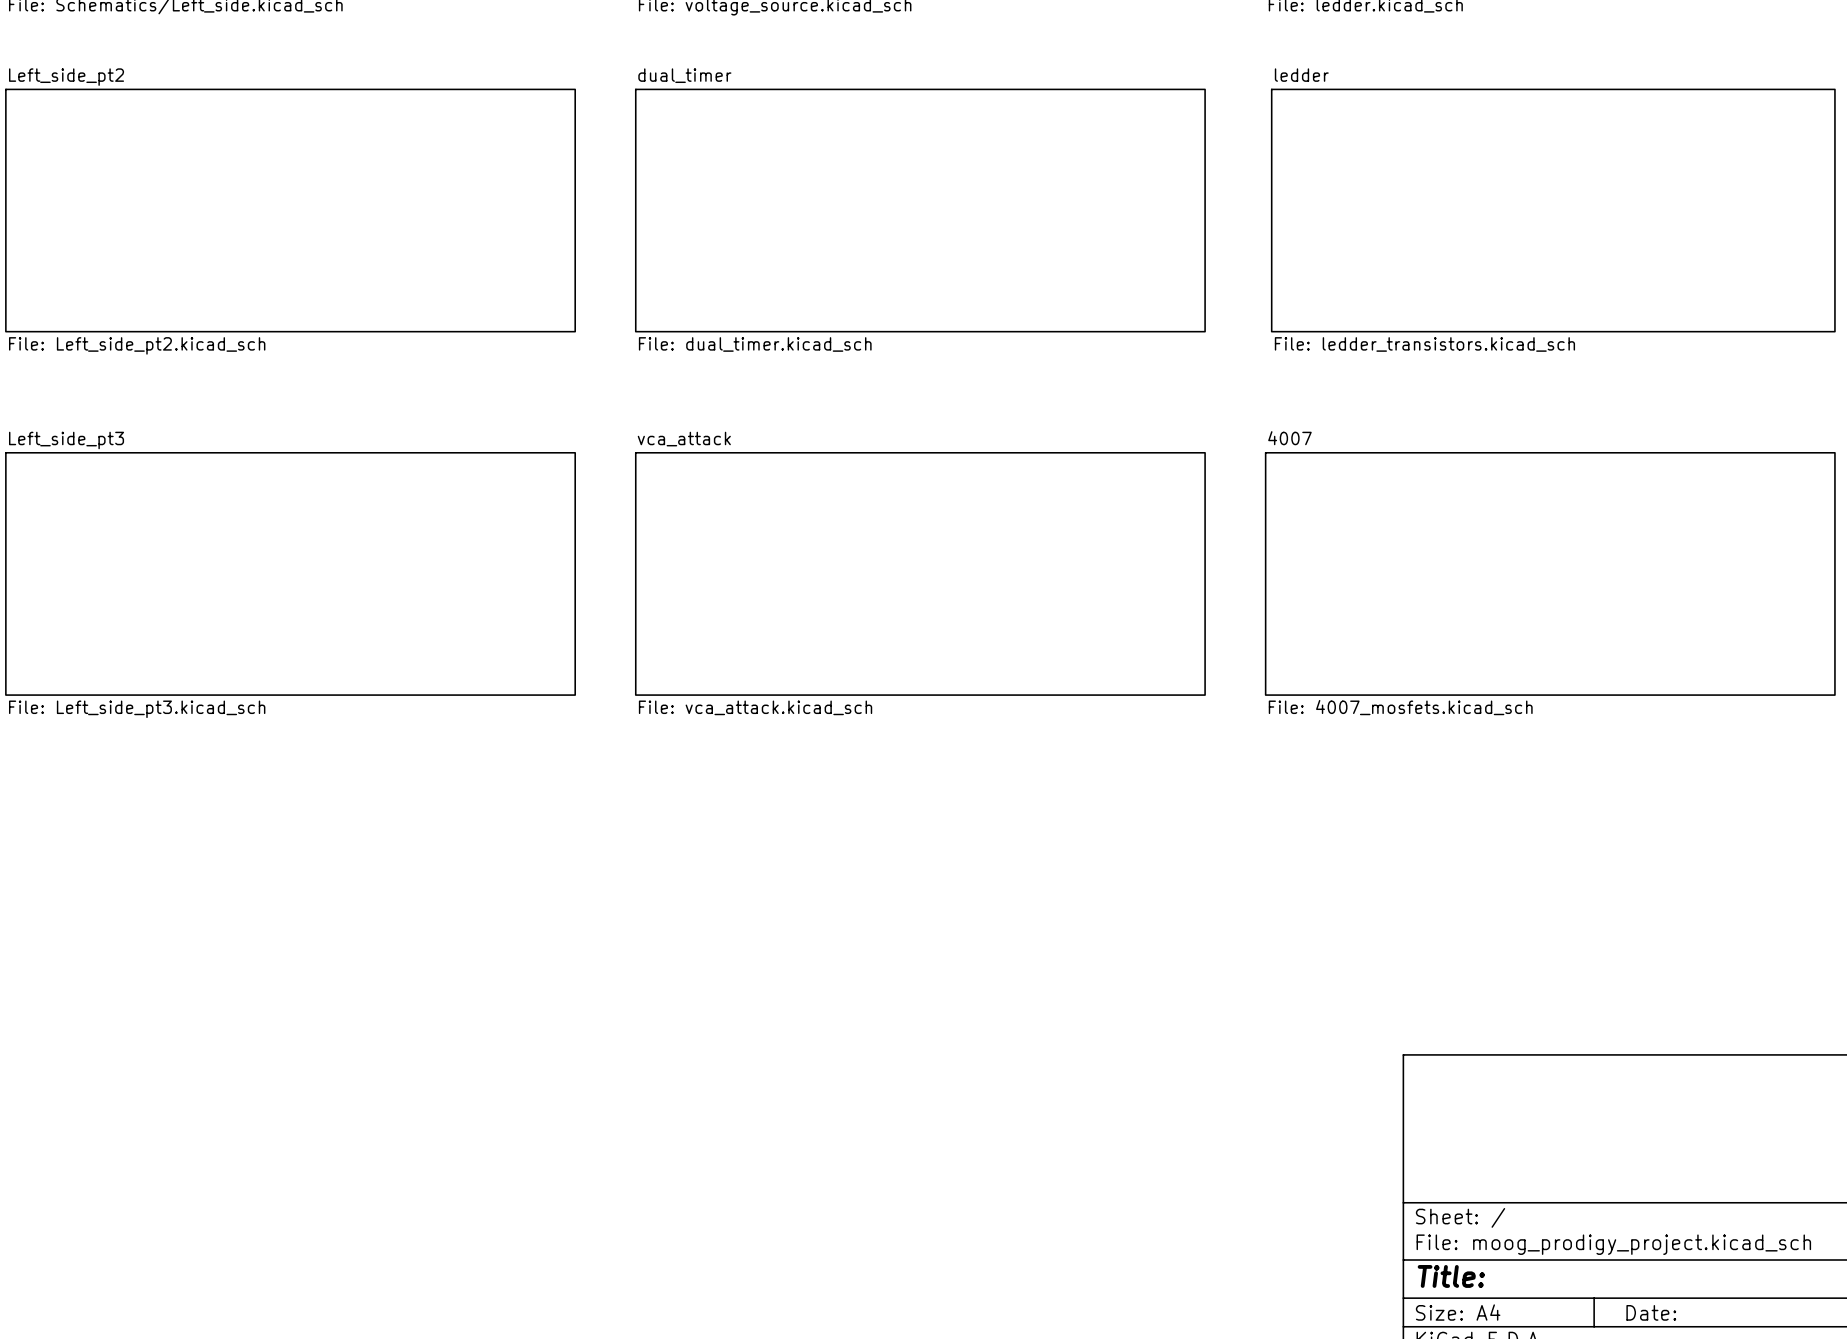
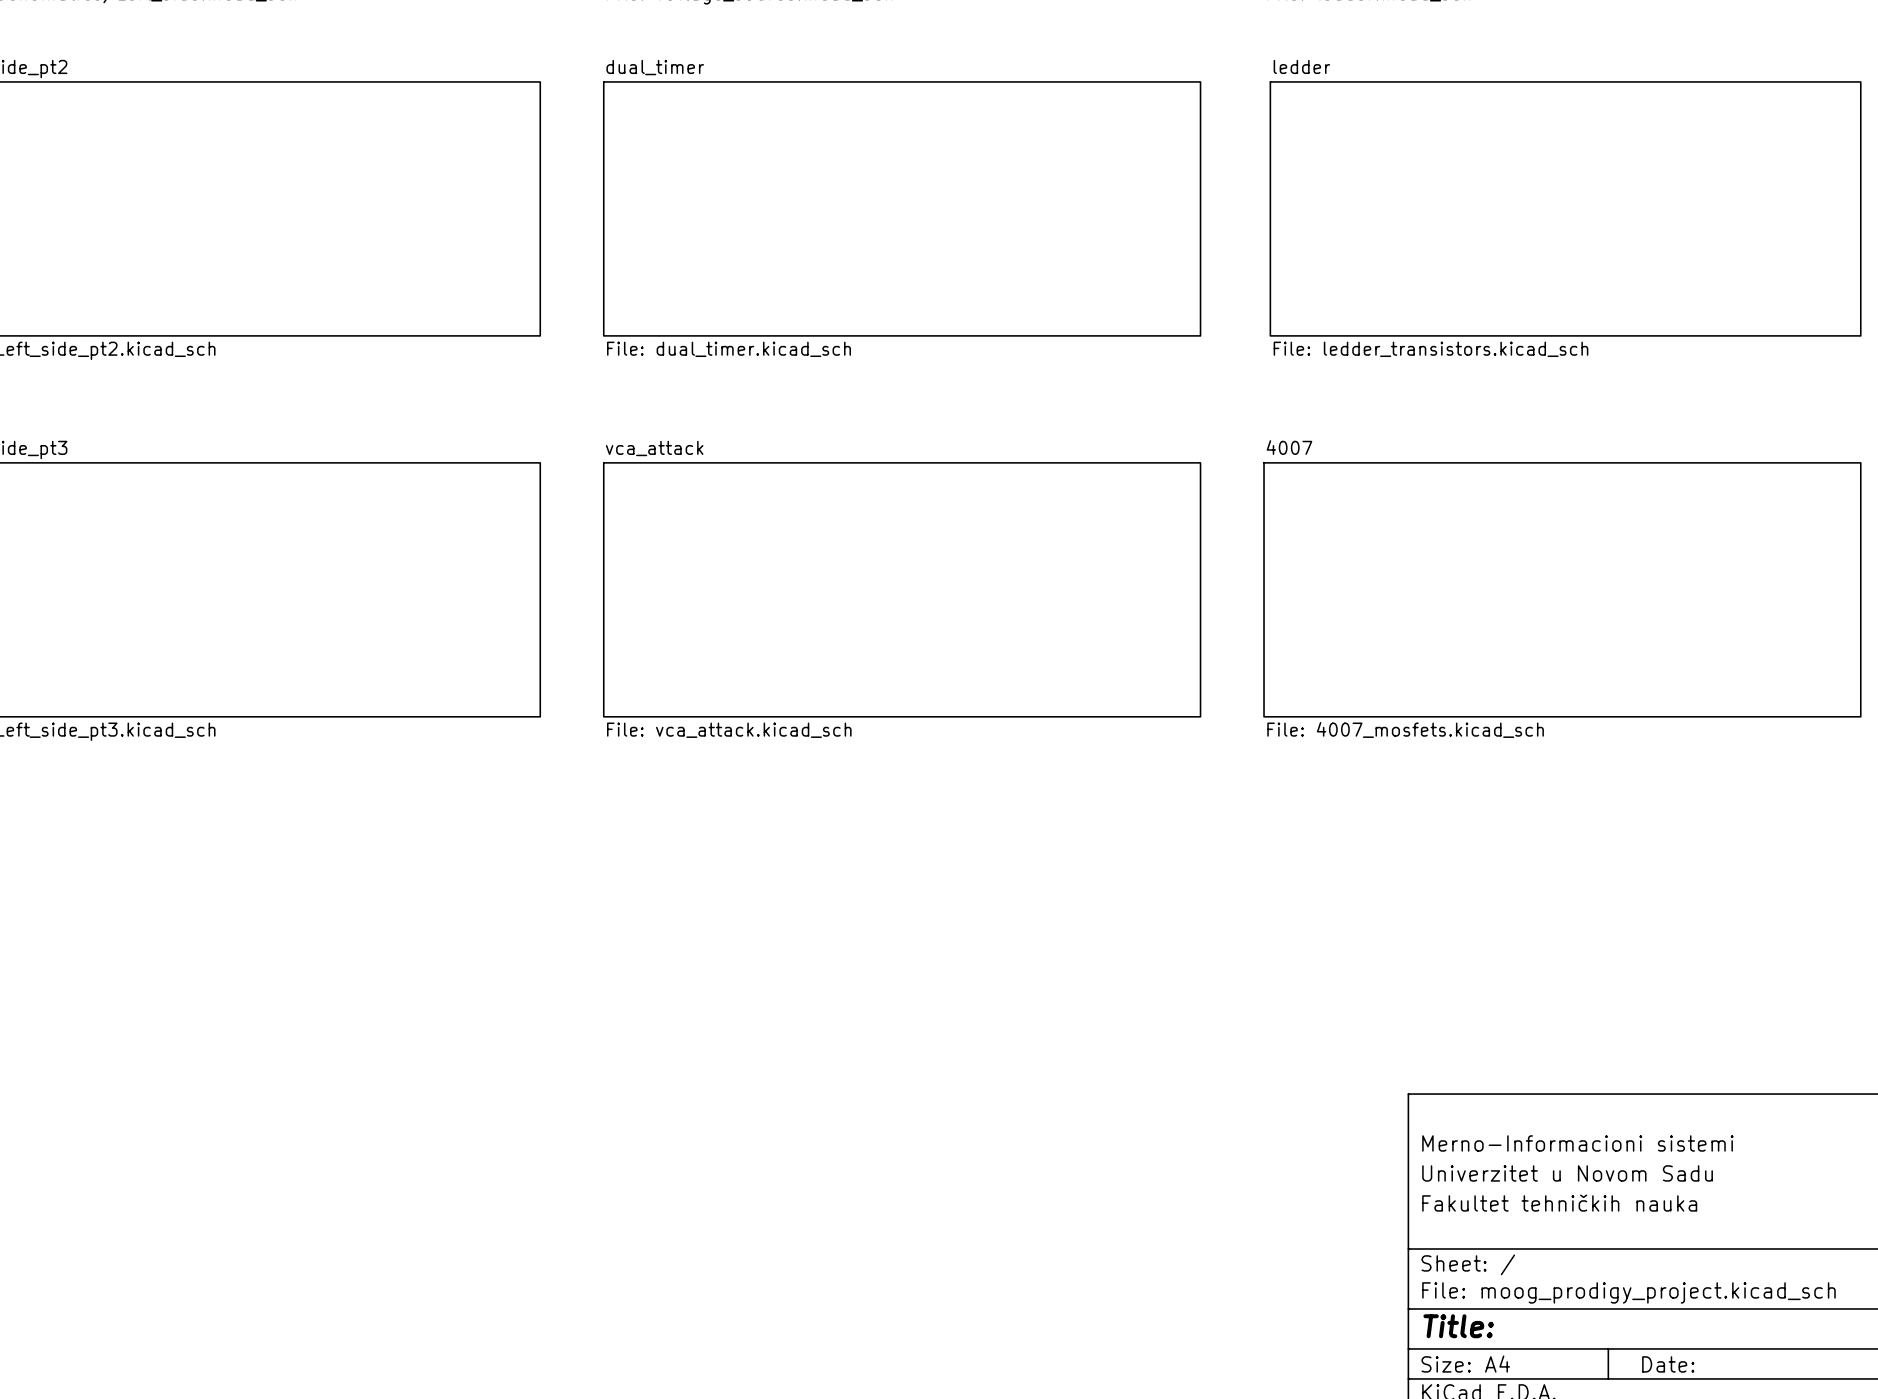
title block: none -> Merno-Informacioni sistemi (1577, 1143)
title block: none -> Univerzitet u Novom Sadu (1567, 1173)
title block: none -> Fakultet tehničkih nauka (1559, 1203)

